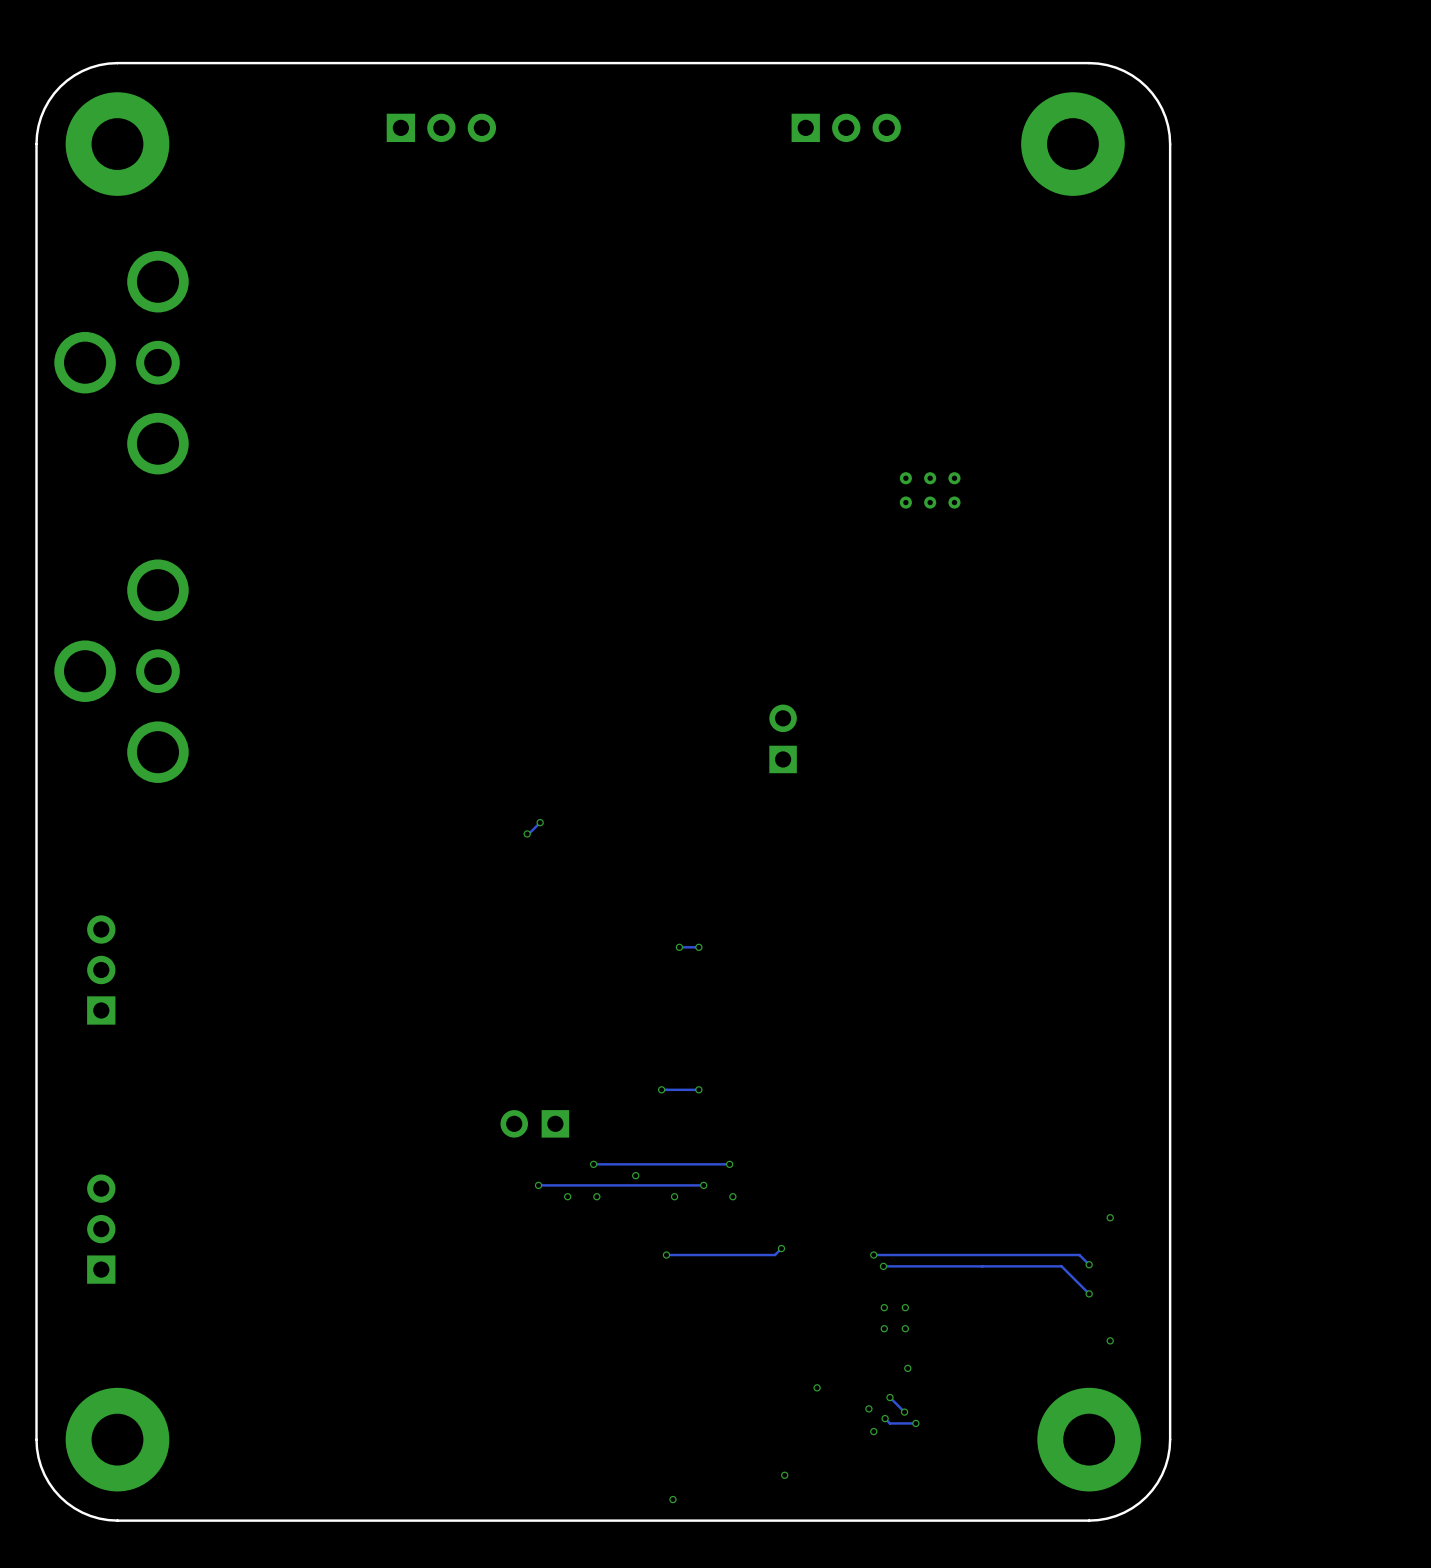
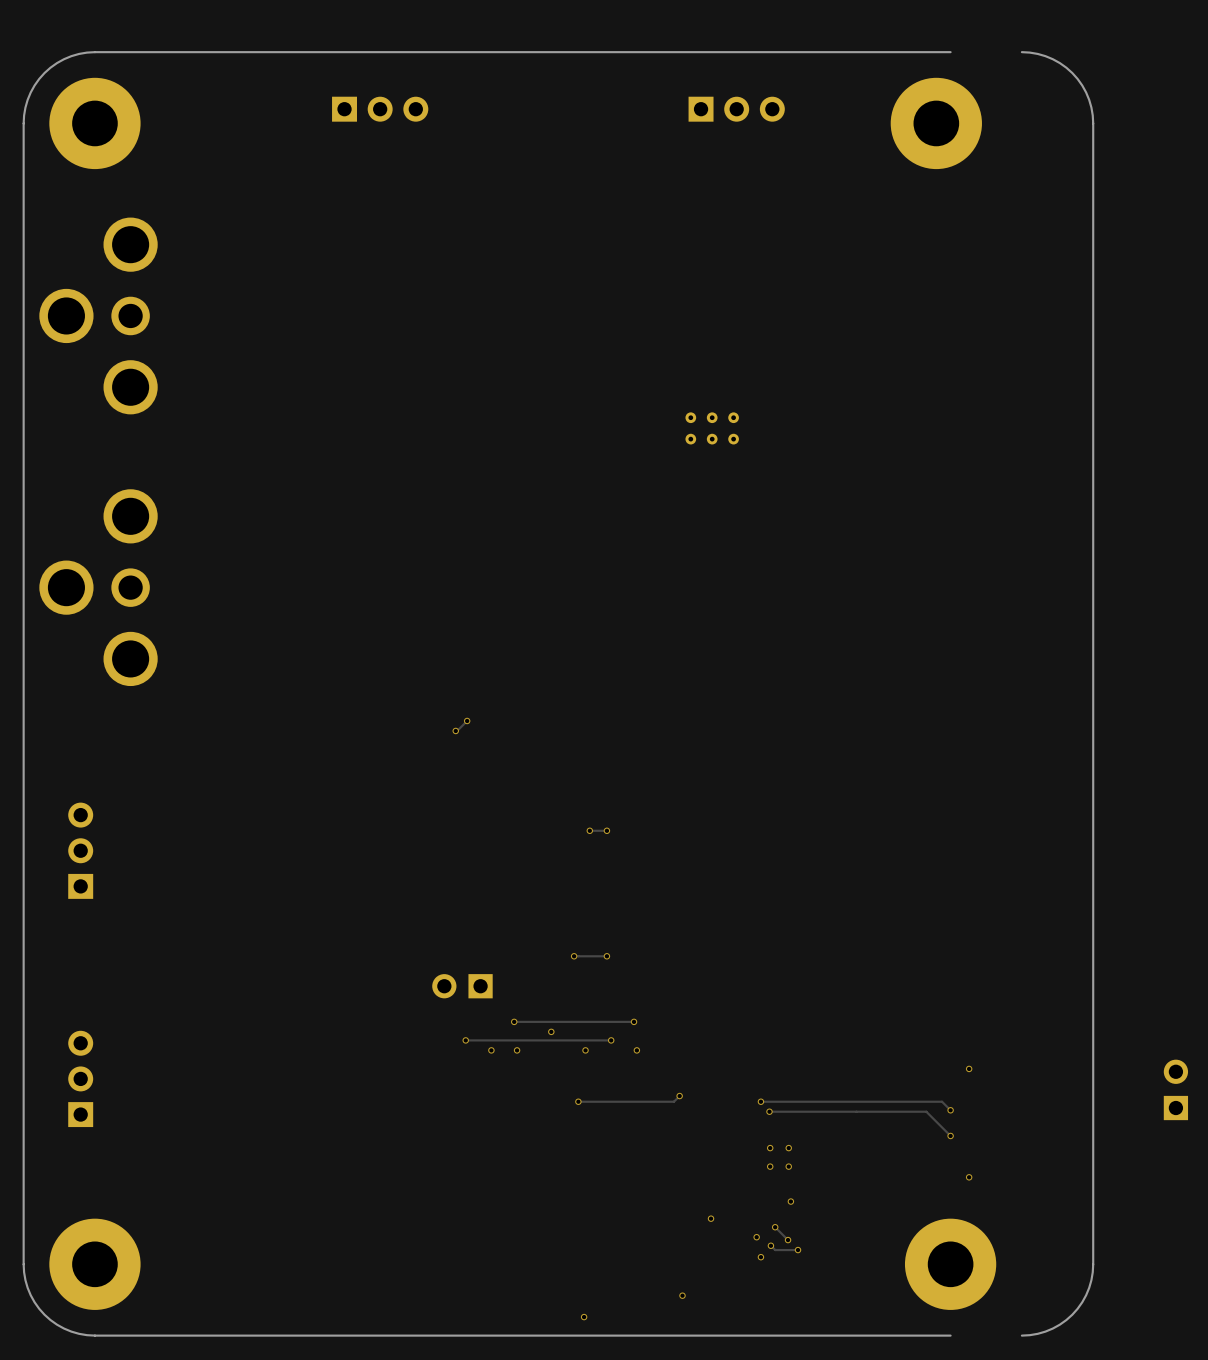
board edge: (1089, 63) (1115, 67) (1132, 75) (1146, 86) (1157, 100) (1165, 117) (1170, 144) (1169, 1448) (1162, 1474) (1146, 1496) (1132, 1508) (1115, 1516) (1089, 1520) -> (1021, 52) (1045, 56) (1059, 63) (1072, 73) (1082, 85) (1089, 99) (1093, 123) (1092, 1272) (1086, 1295) (1072, 1314) (1059, 1324) (1045, 1331) (1021, 1335)
part position: (930, 490) -> (712, 428)
part: (783, 738) -> none
part: none -> (1175, 1089)

